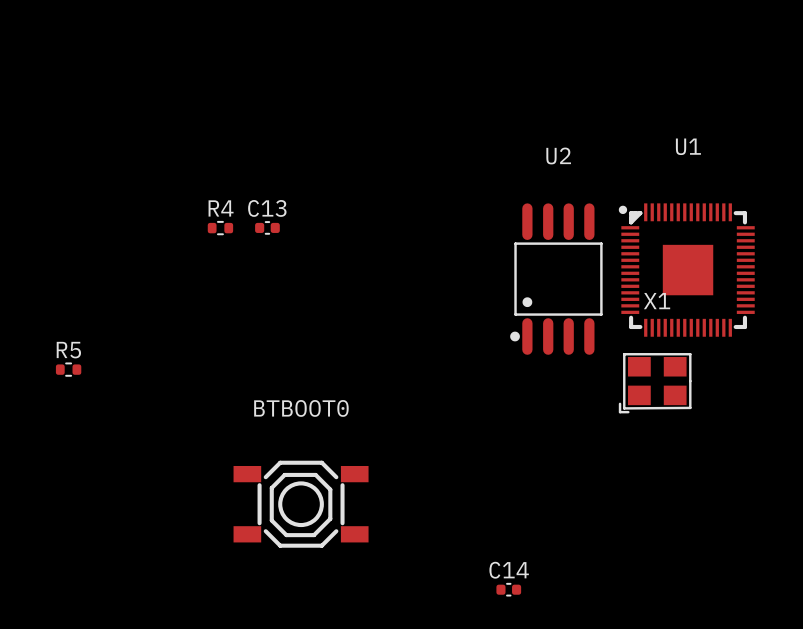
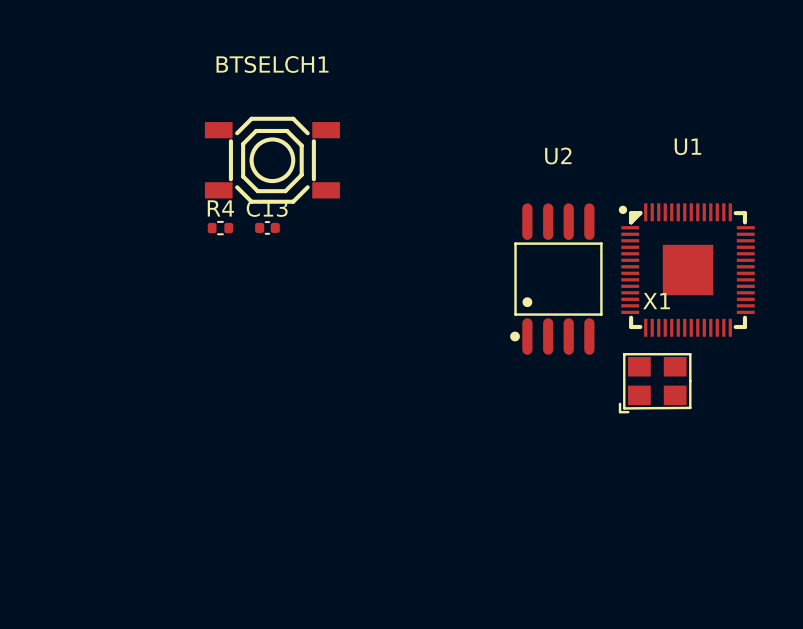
BTSELCH1: none -> (272, 160)
R5: (68, 369) -> none
BTBOOT0: (301, 504) -> none
C14: (508, 589) -> none

